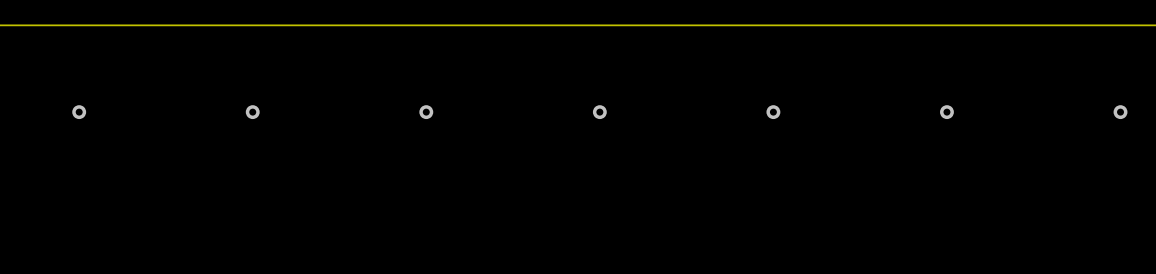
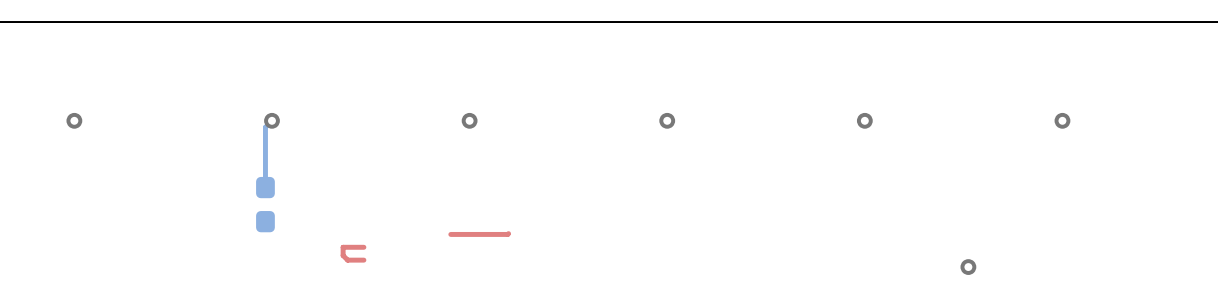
bottom track: none -> (271, 120) (265, 127) (265, 187)
part: none -> (265, 204)
top track: none -> (508, 233) (450, 234)
top track: none -> (363, 247) (343, 247) (343, 255) (347, 260) (363, 260)
via: none -> (968, 267)

